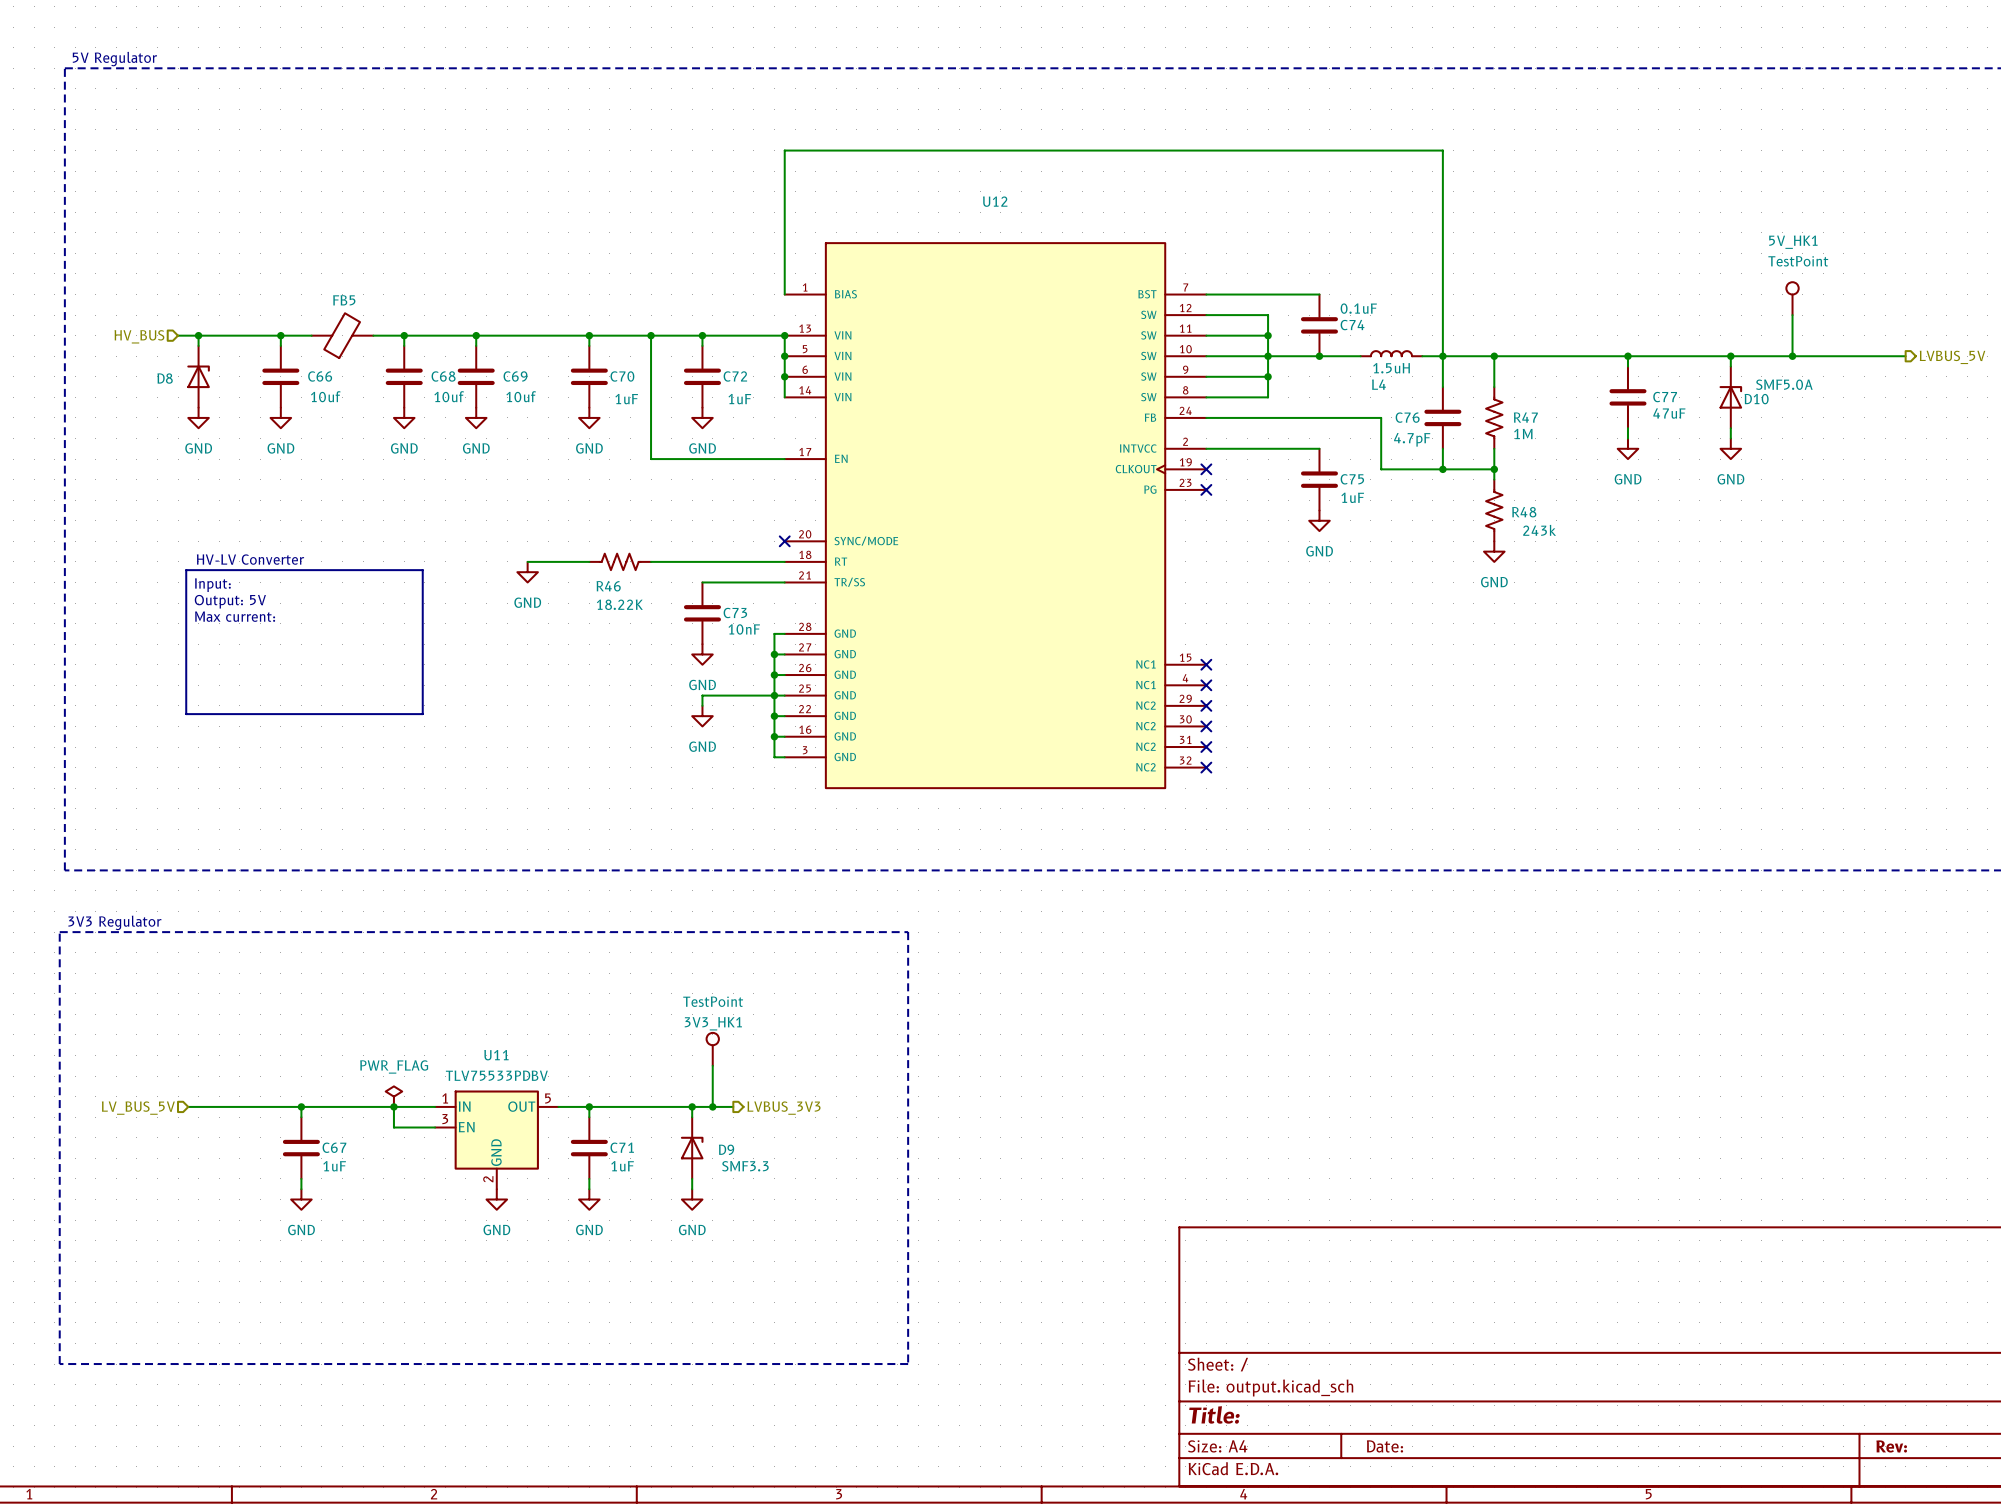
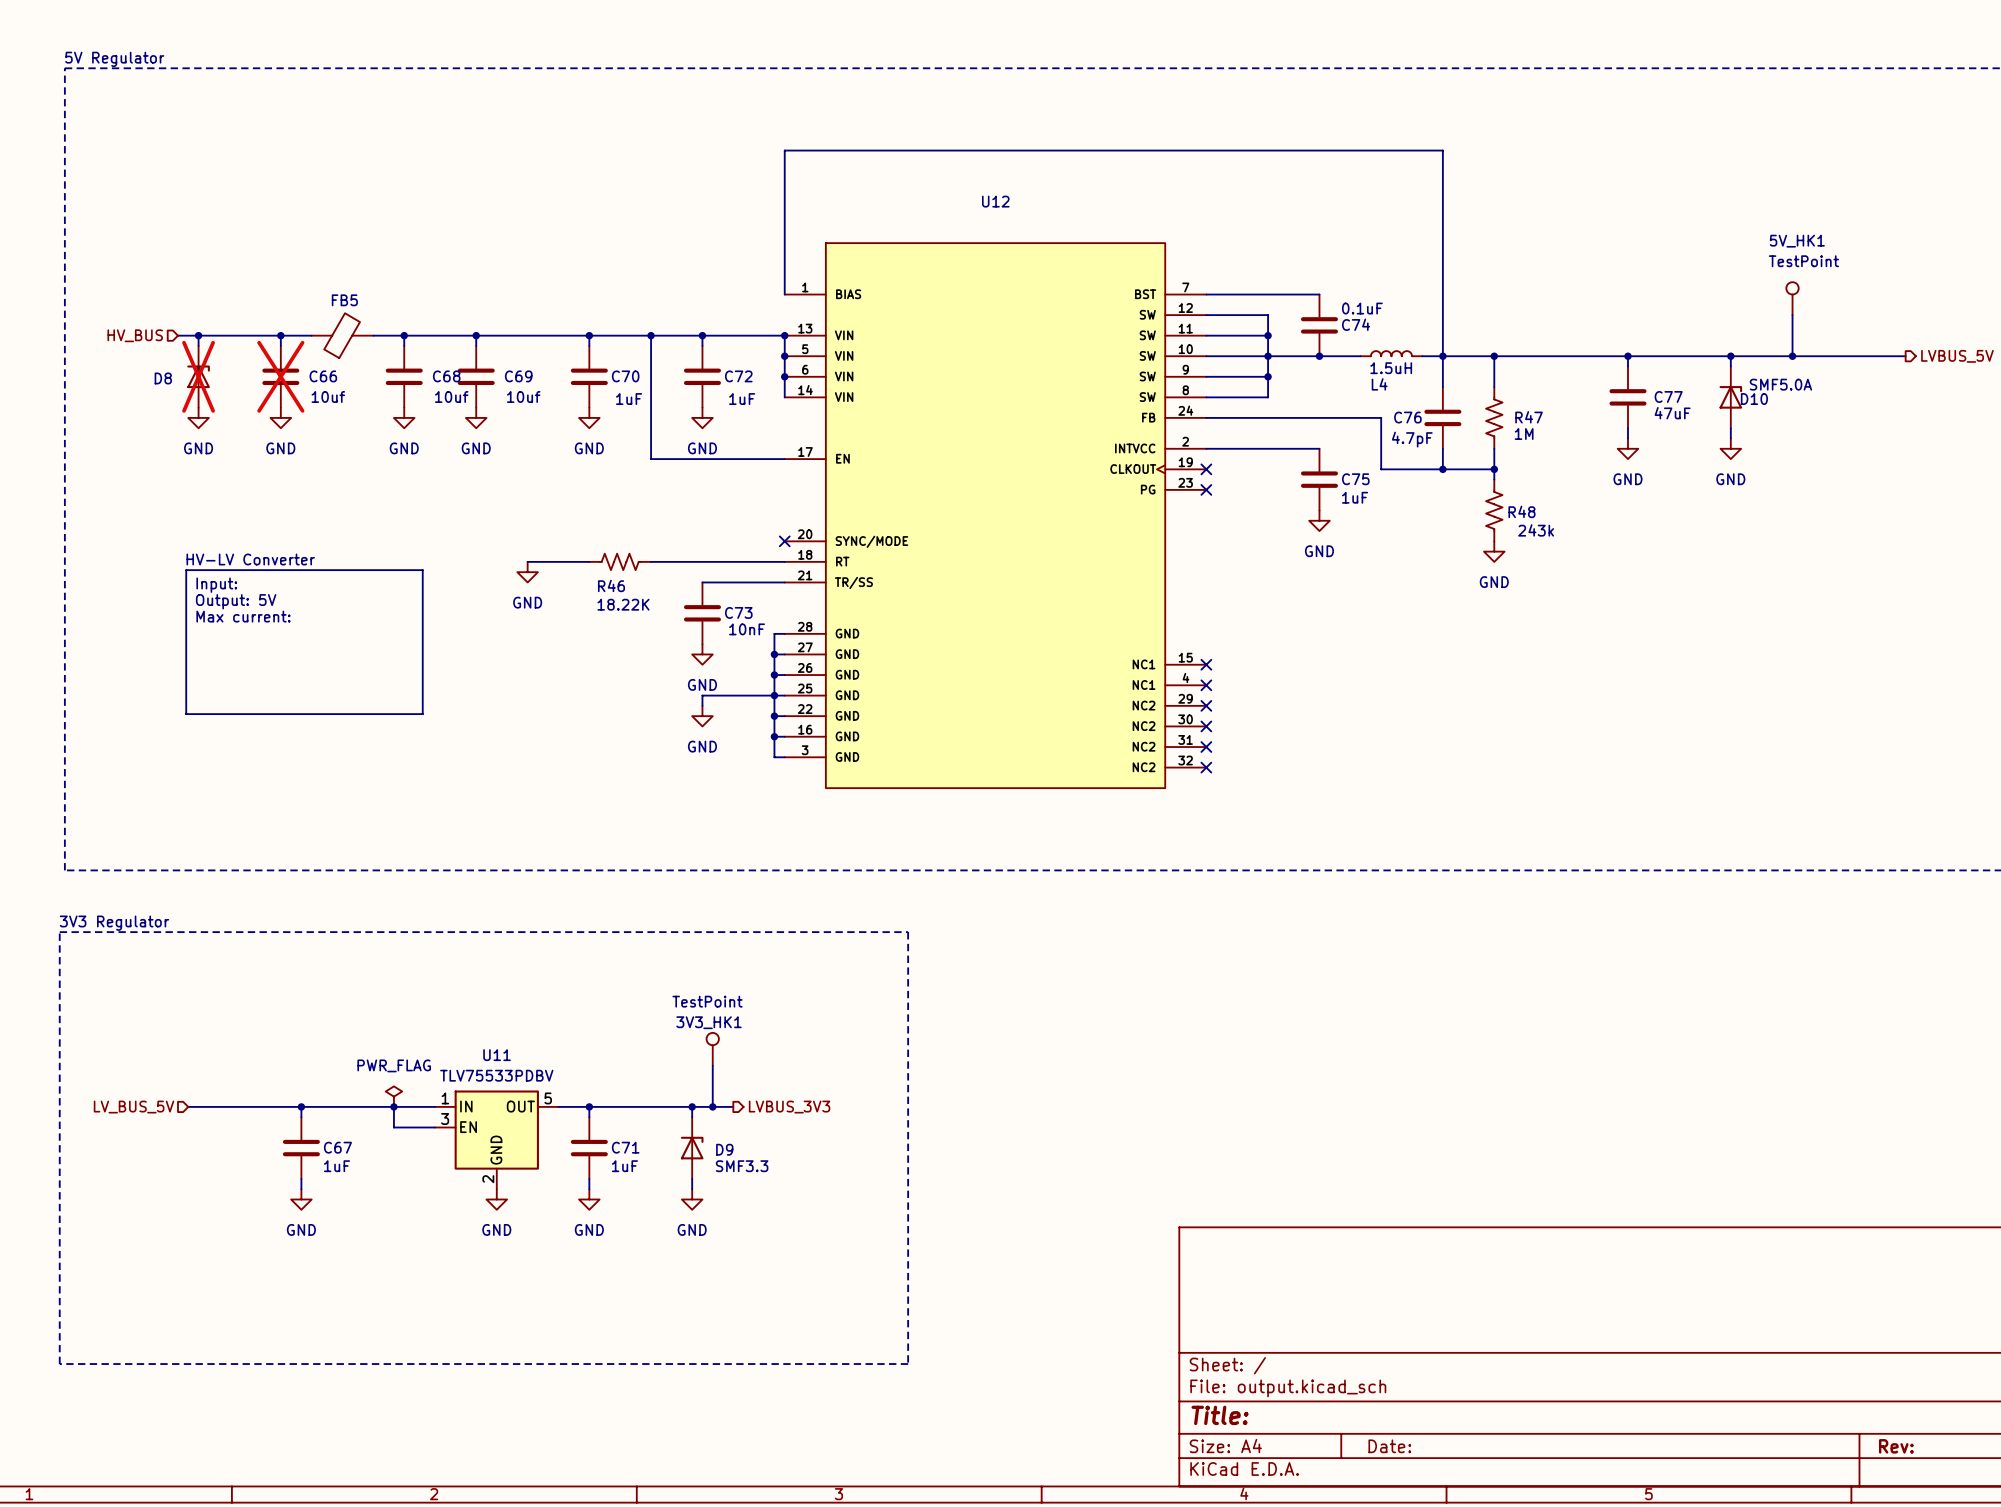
D8 do-not-place cross: none -> (198, 376)
C66 do-not-place cross: none -> (280, 376)

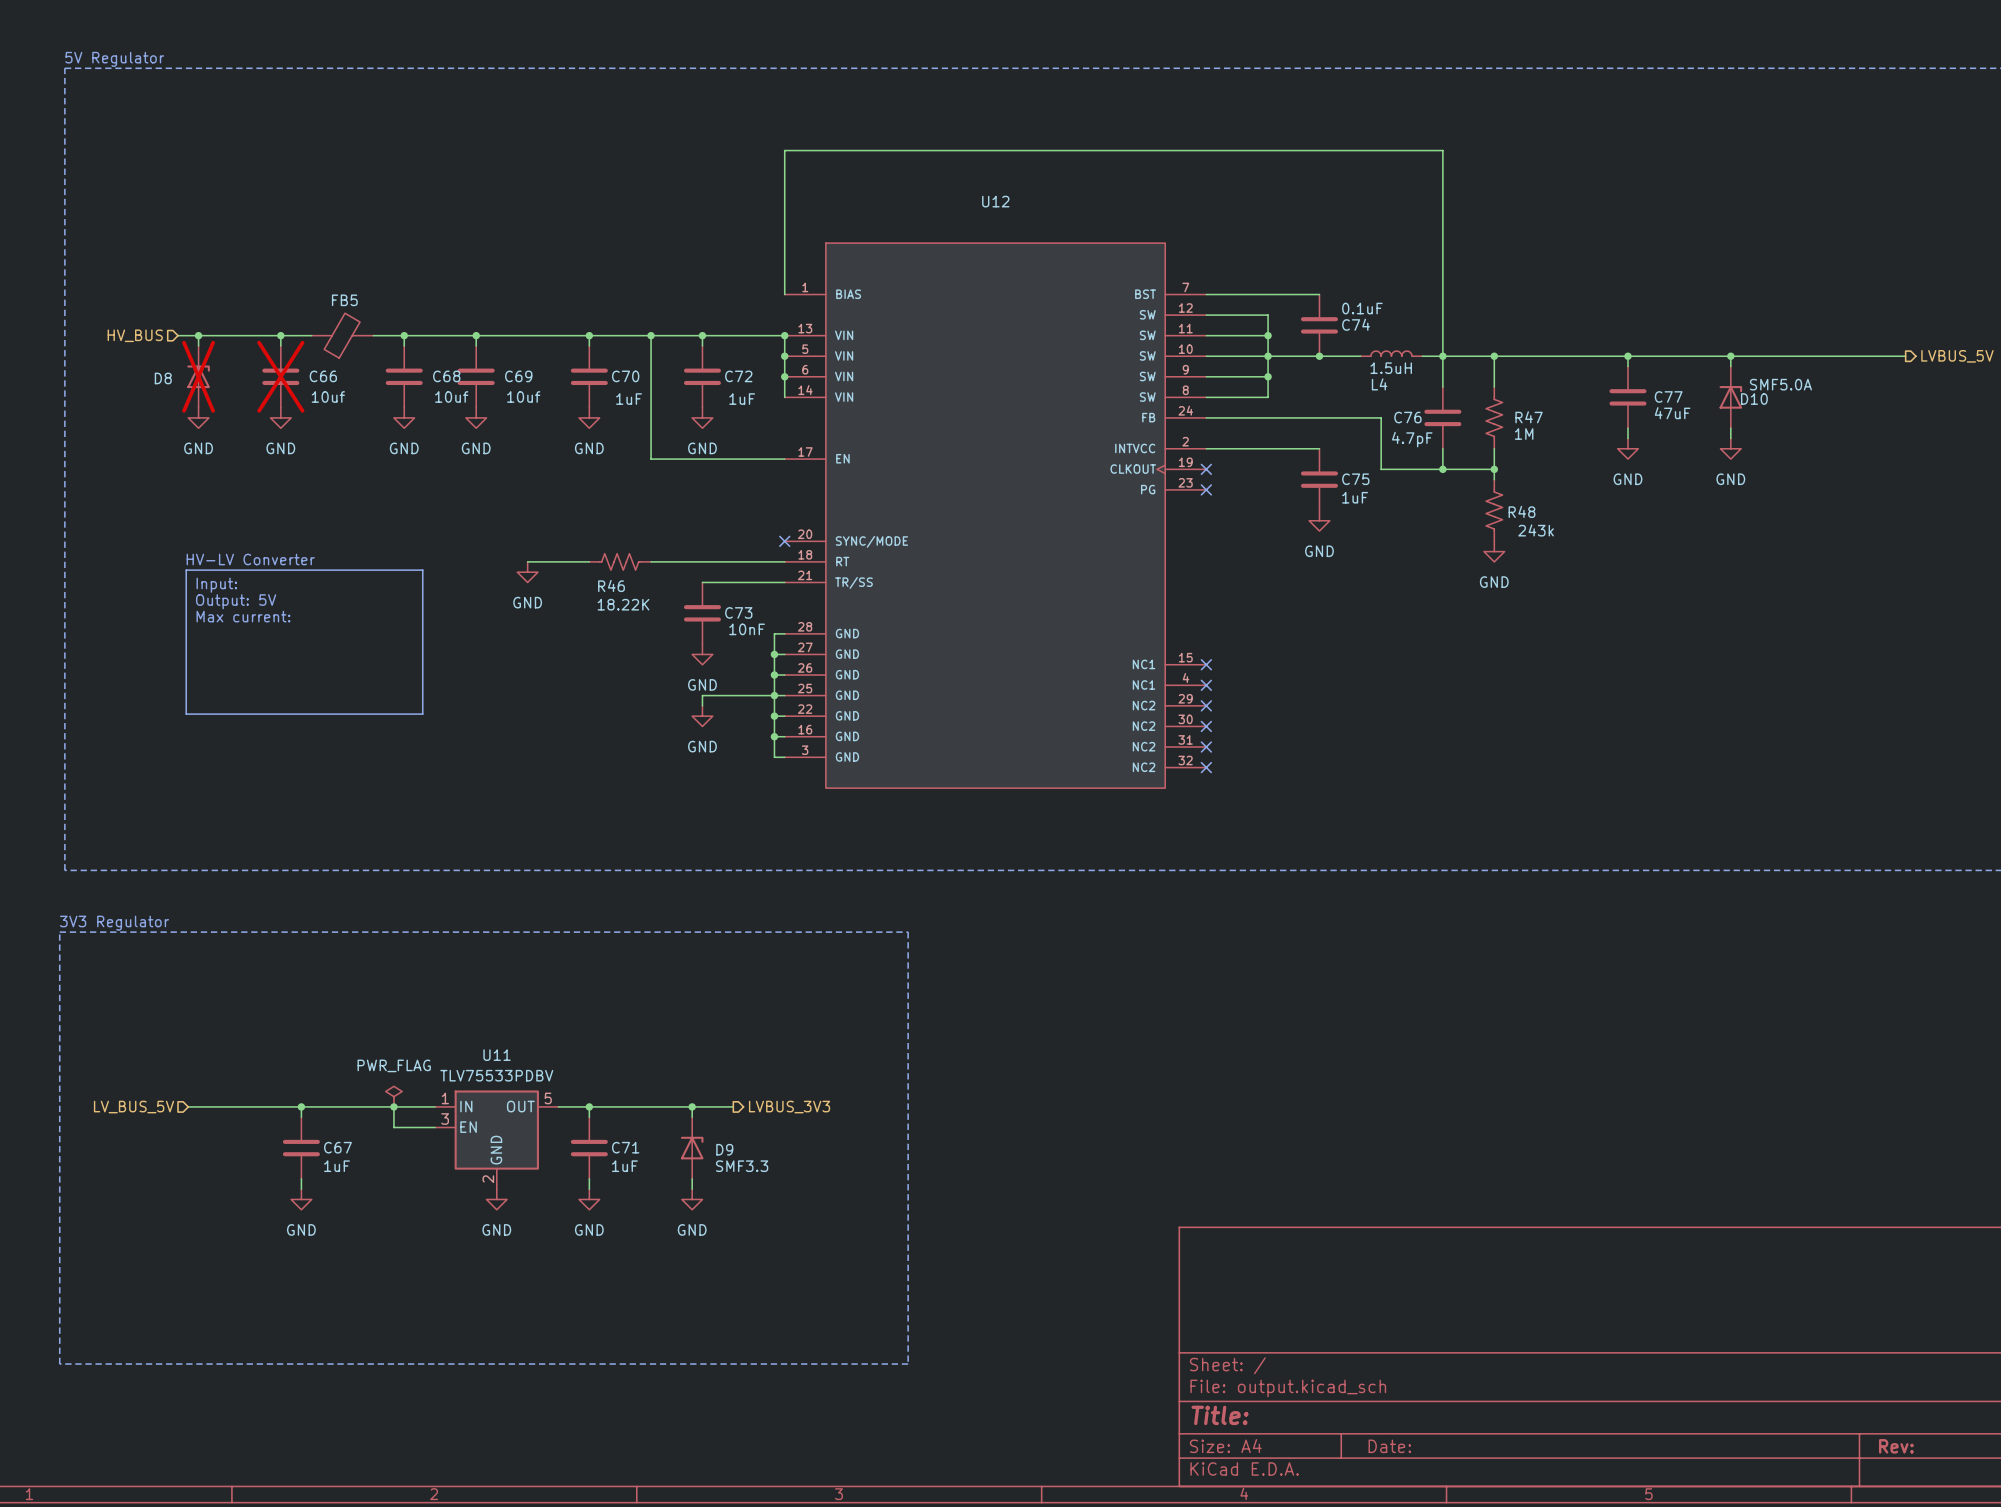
5V_HK1: TestPoint (1792, 298) -> none
wire: (1792, 315) (1792, 356) -> none
junction: (1792, 356) -> none
3V3_HK1: TestPoint (712, 1049) -> none
wire: (712, 1065) (712, 1106) -> none
junction: (712, 1106) -> none

